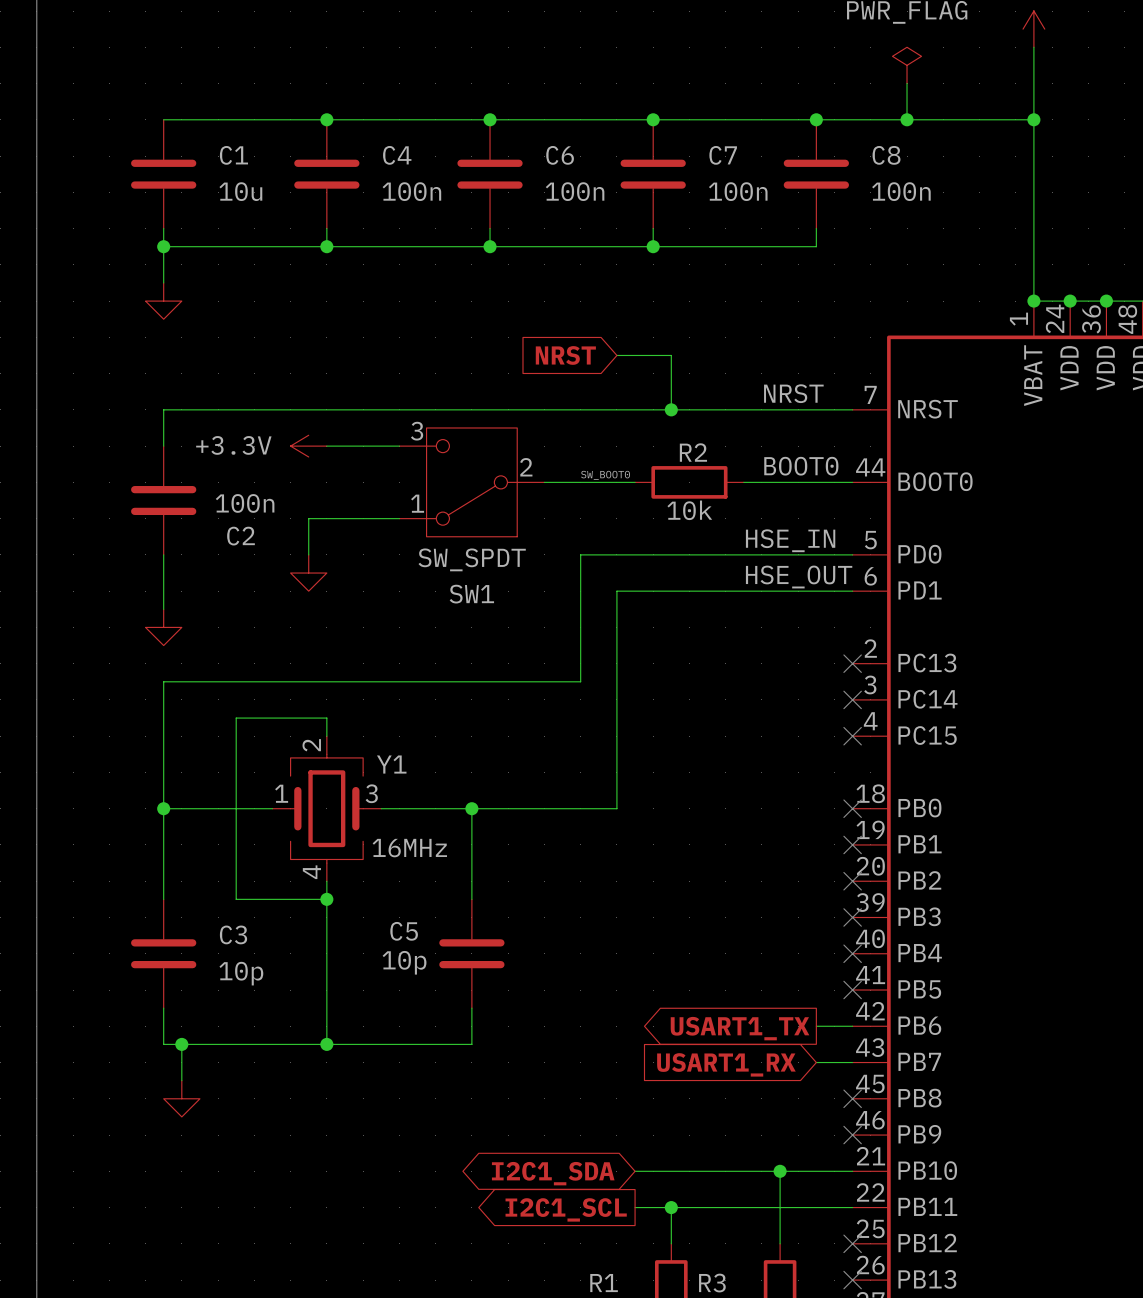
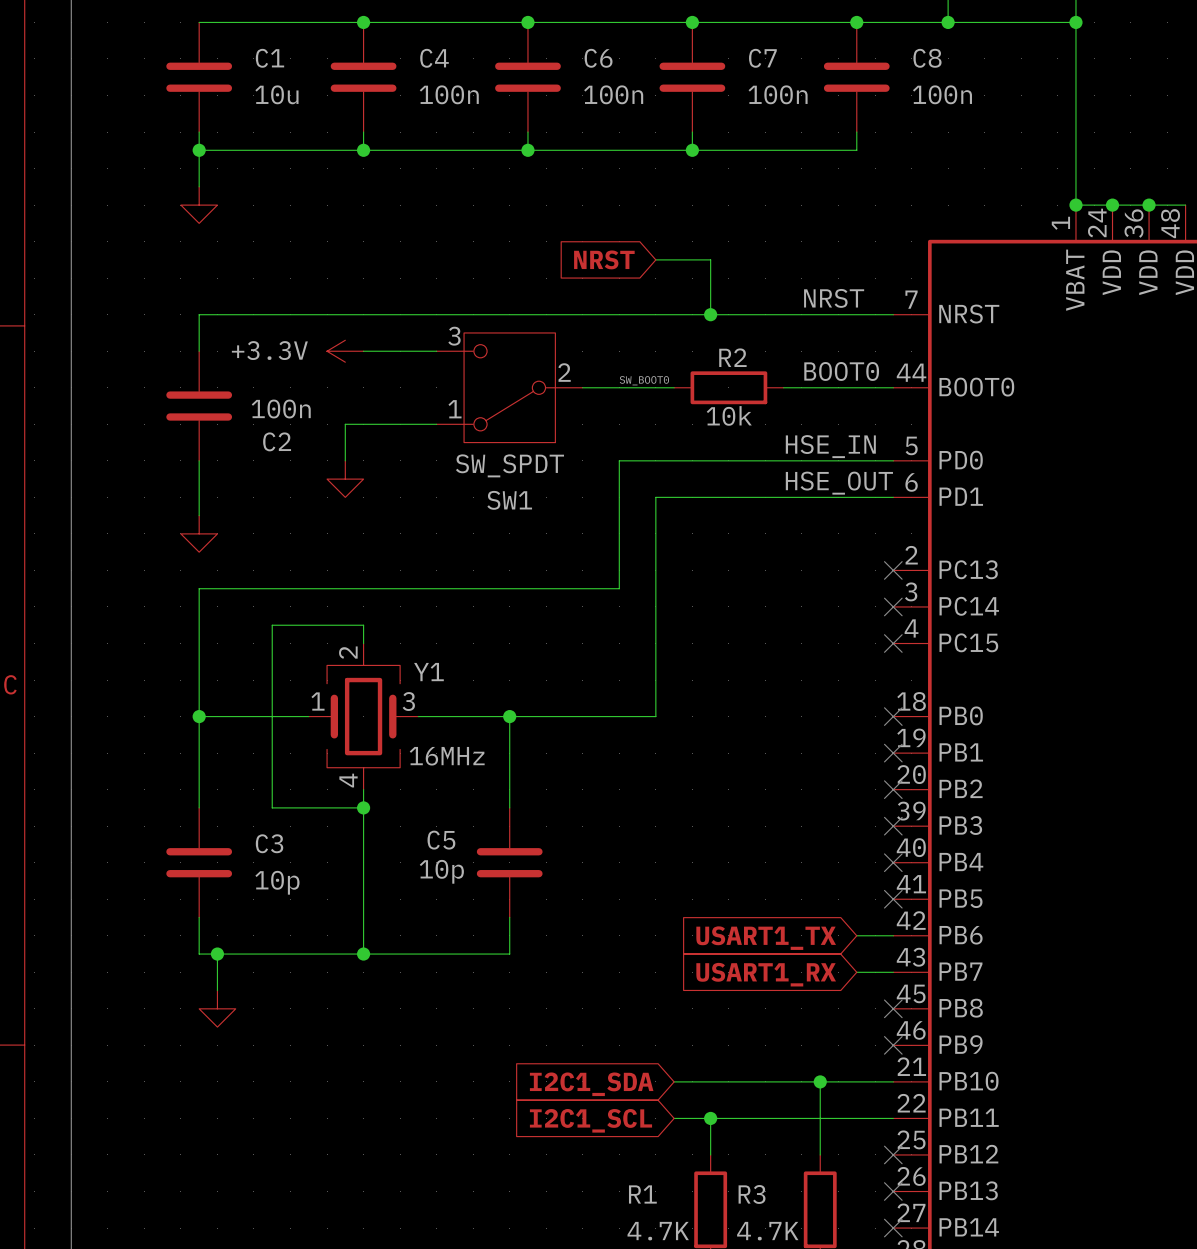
global label shape: output (740, 1028) -> input (766, 938)
global label shape: bidirectional (553, 1173) -> input (591, 1084)
global label shape: output (566, 1209) -> input (590, 1120)

